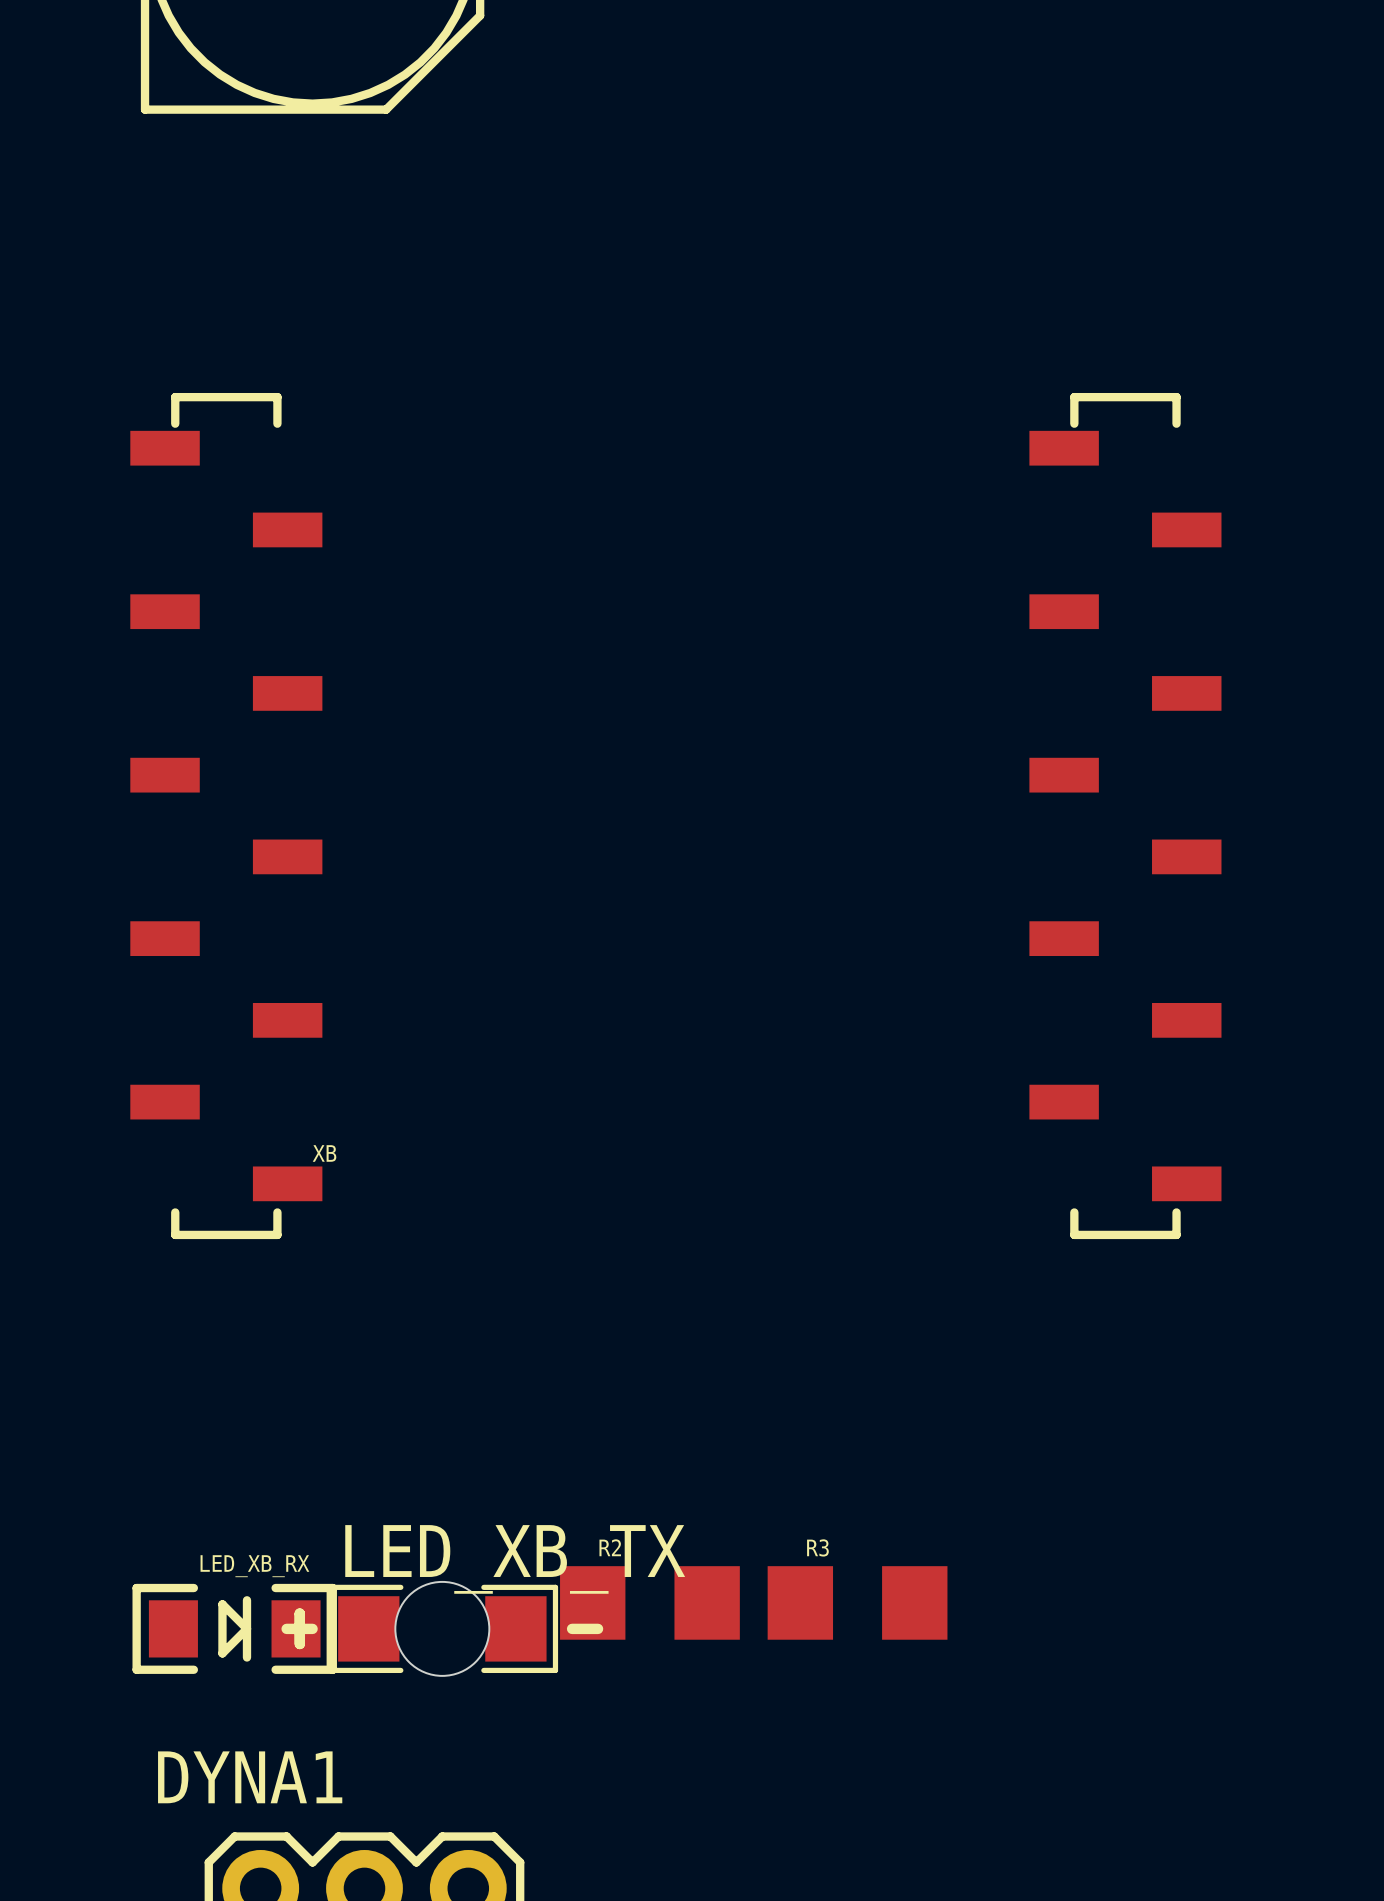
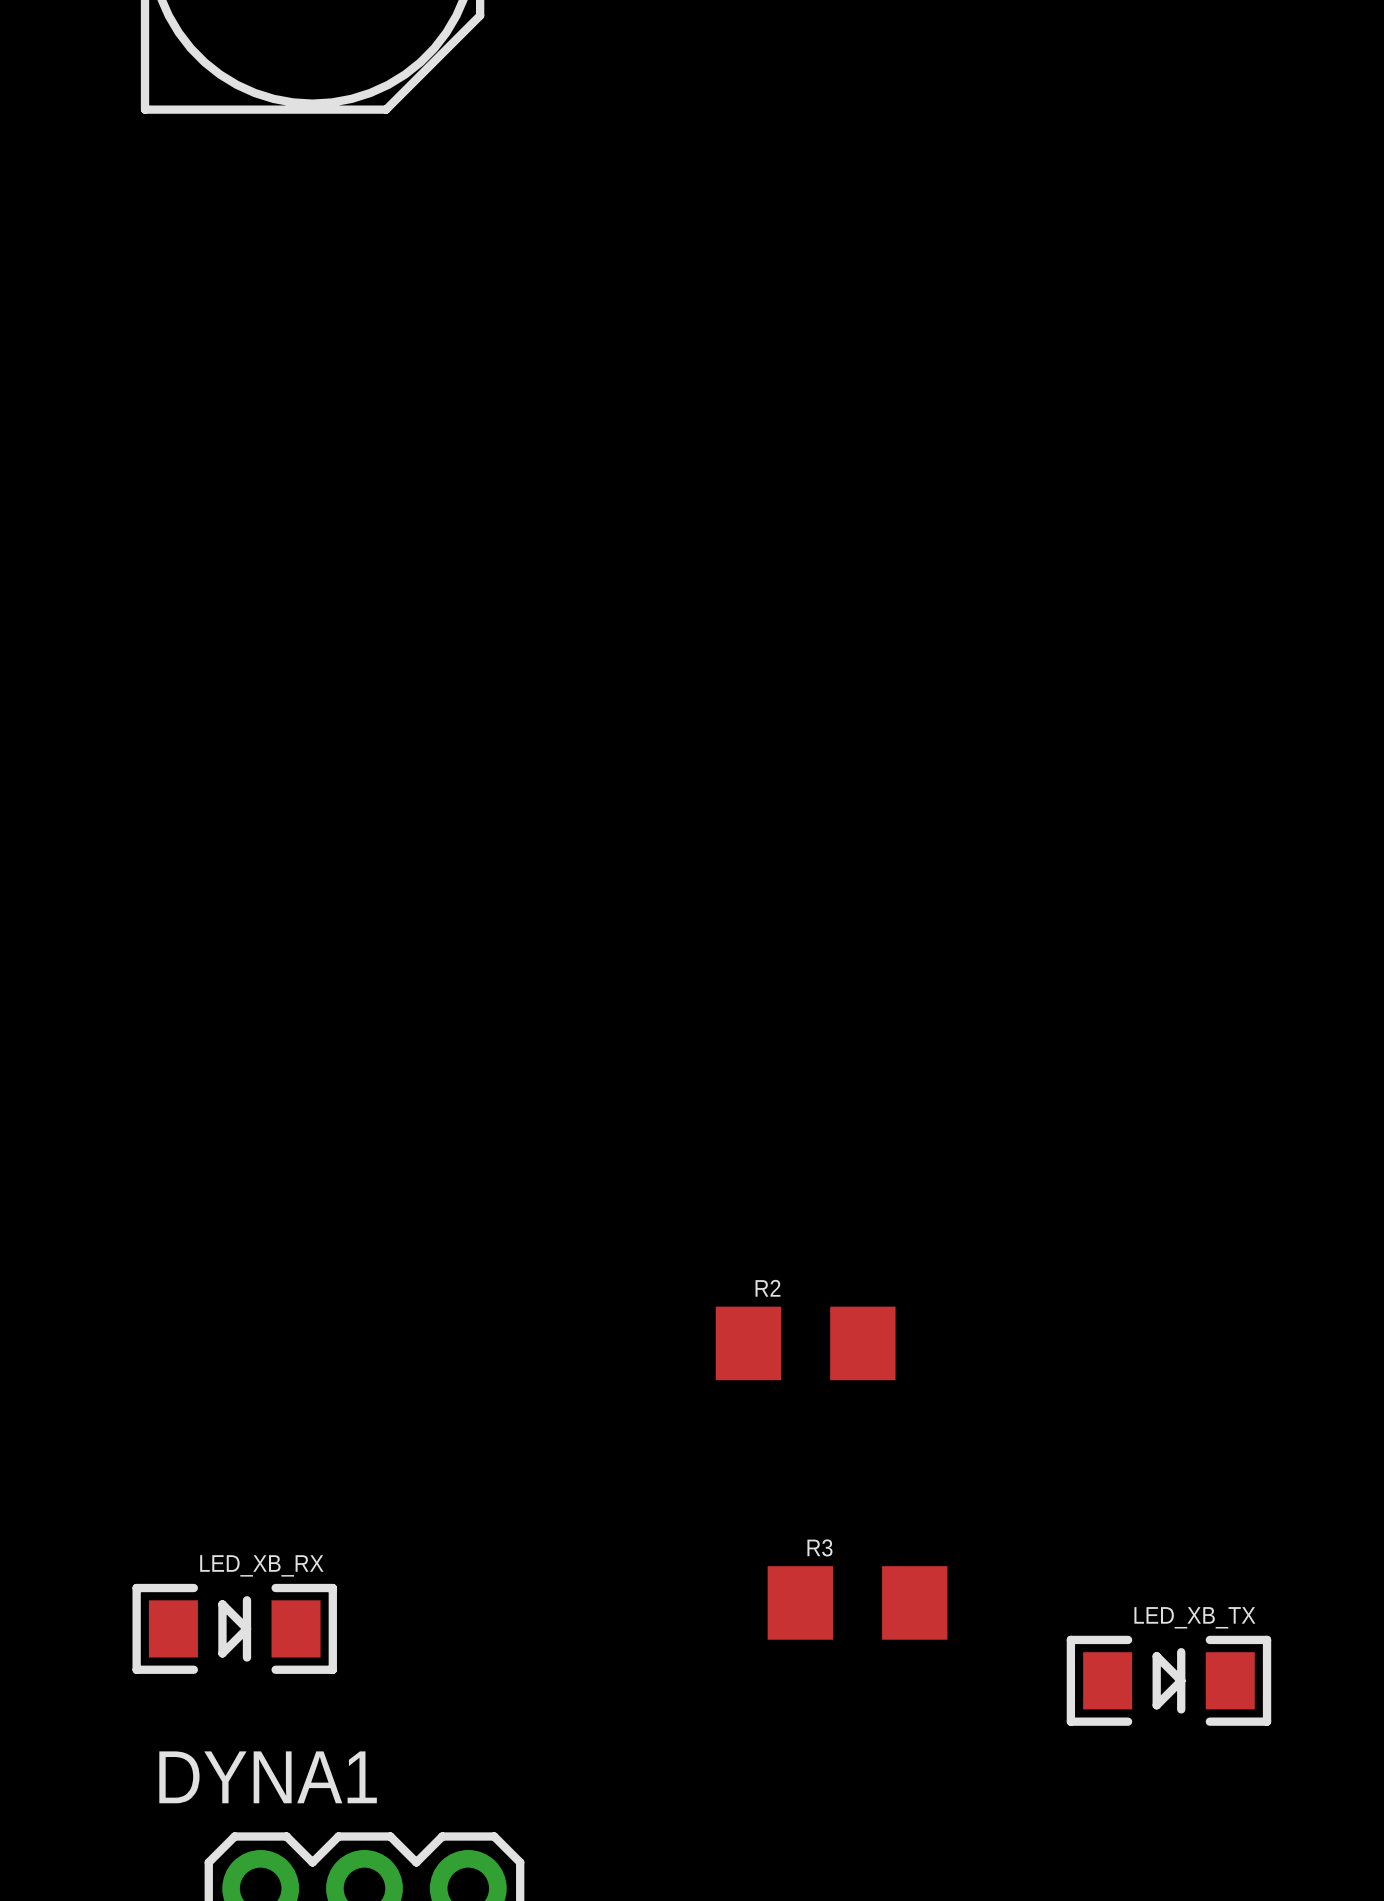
XB: (675, 816) -> none
R2 position: (649, 1602) -> (805, 1343)
LED_XB_TX: (442, 1628) -> none
LED_XB_TX: none -> (1168, 1680)

